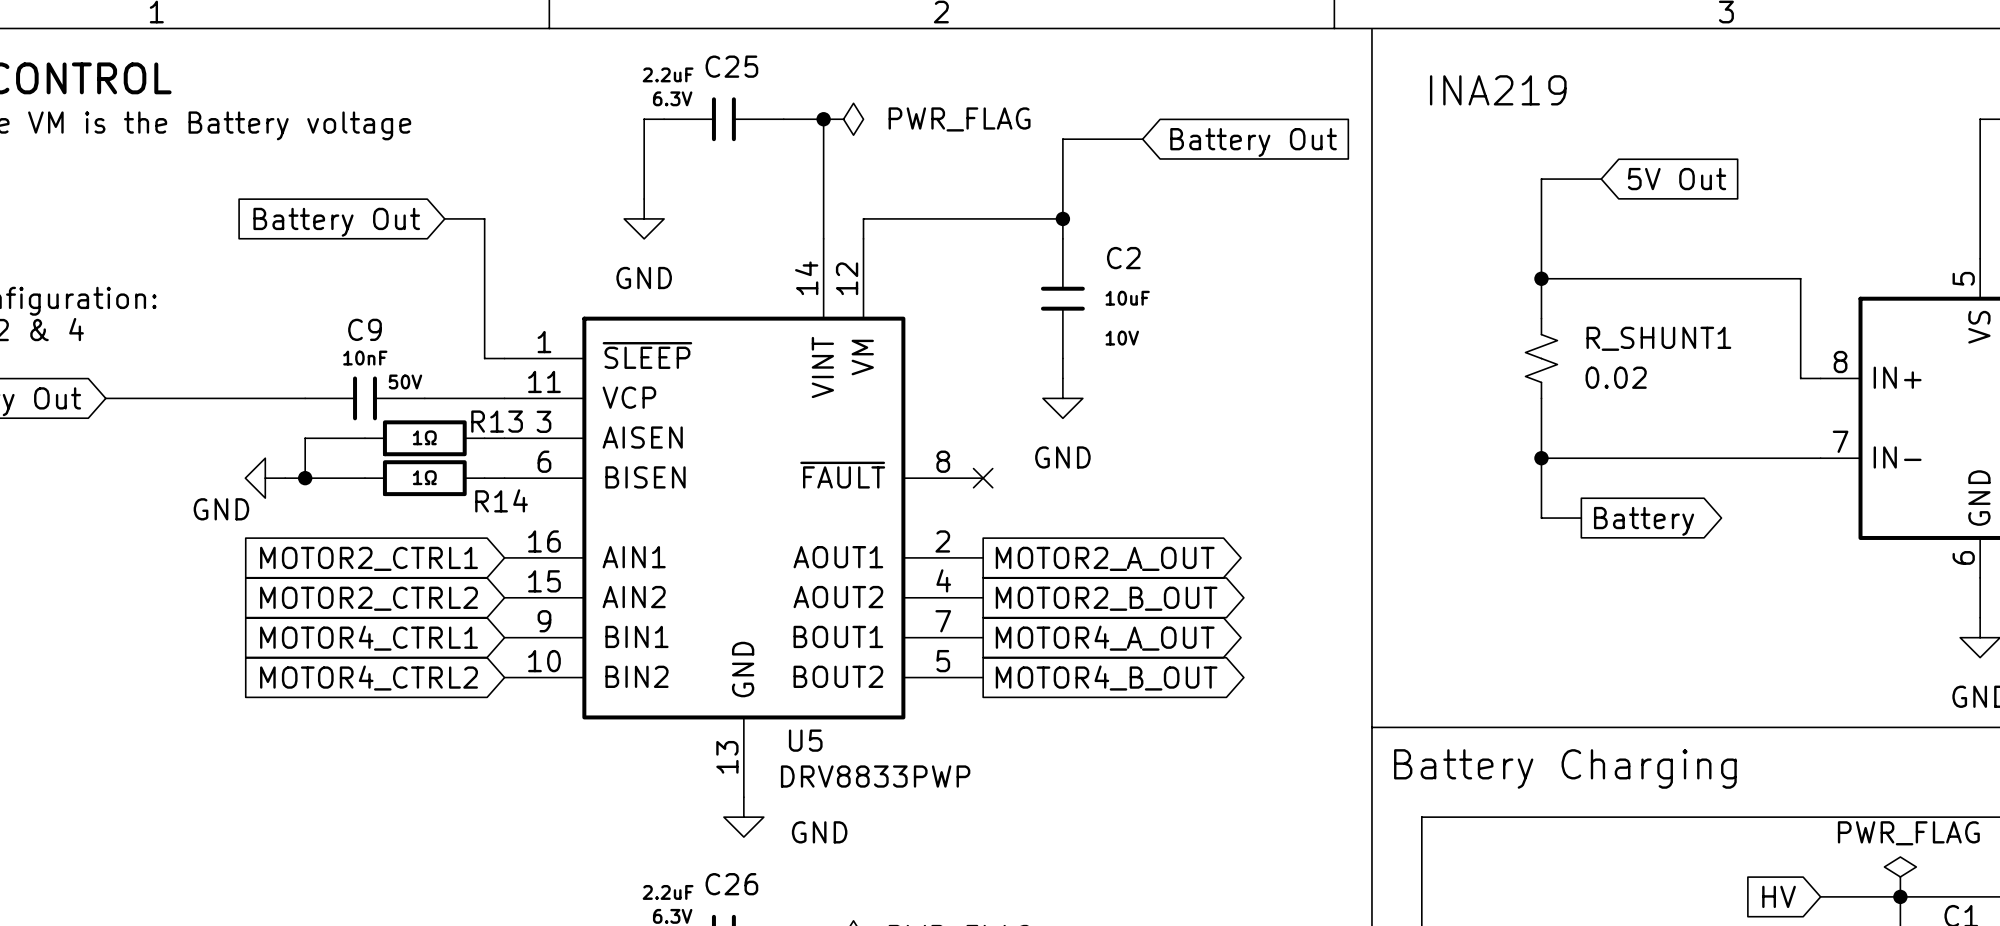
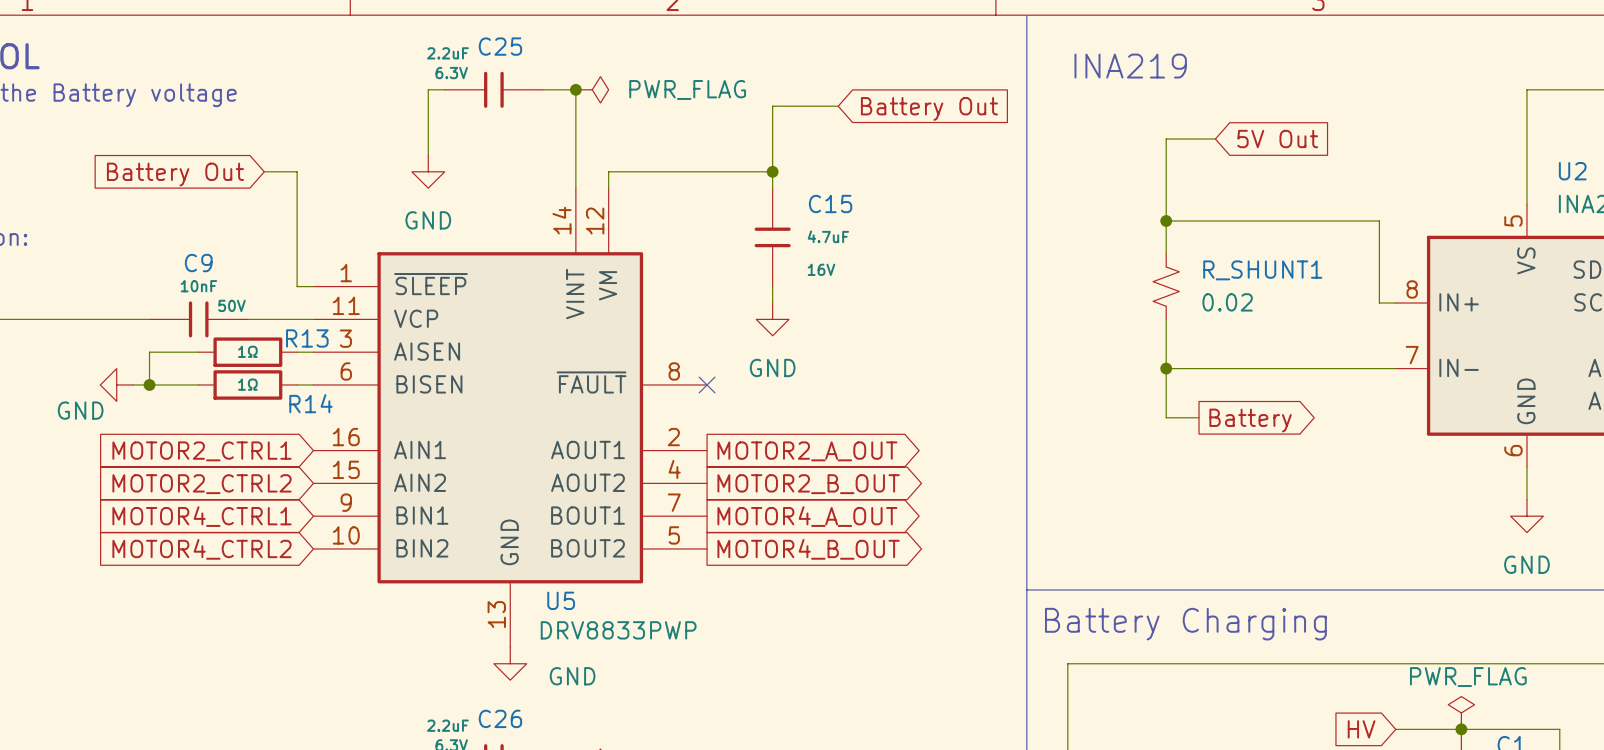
C2 name: C2 (1123, 258) -> C15 (830, 203)
C2 value: 10uF (1127, 298) -> 4.7uF (828, 236)
C2 text: 10V (1122, 338) -> 16V (821, 269)

